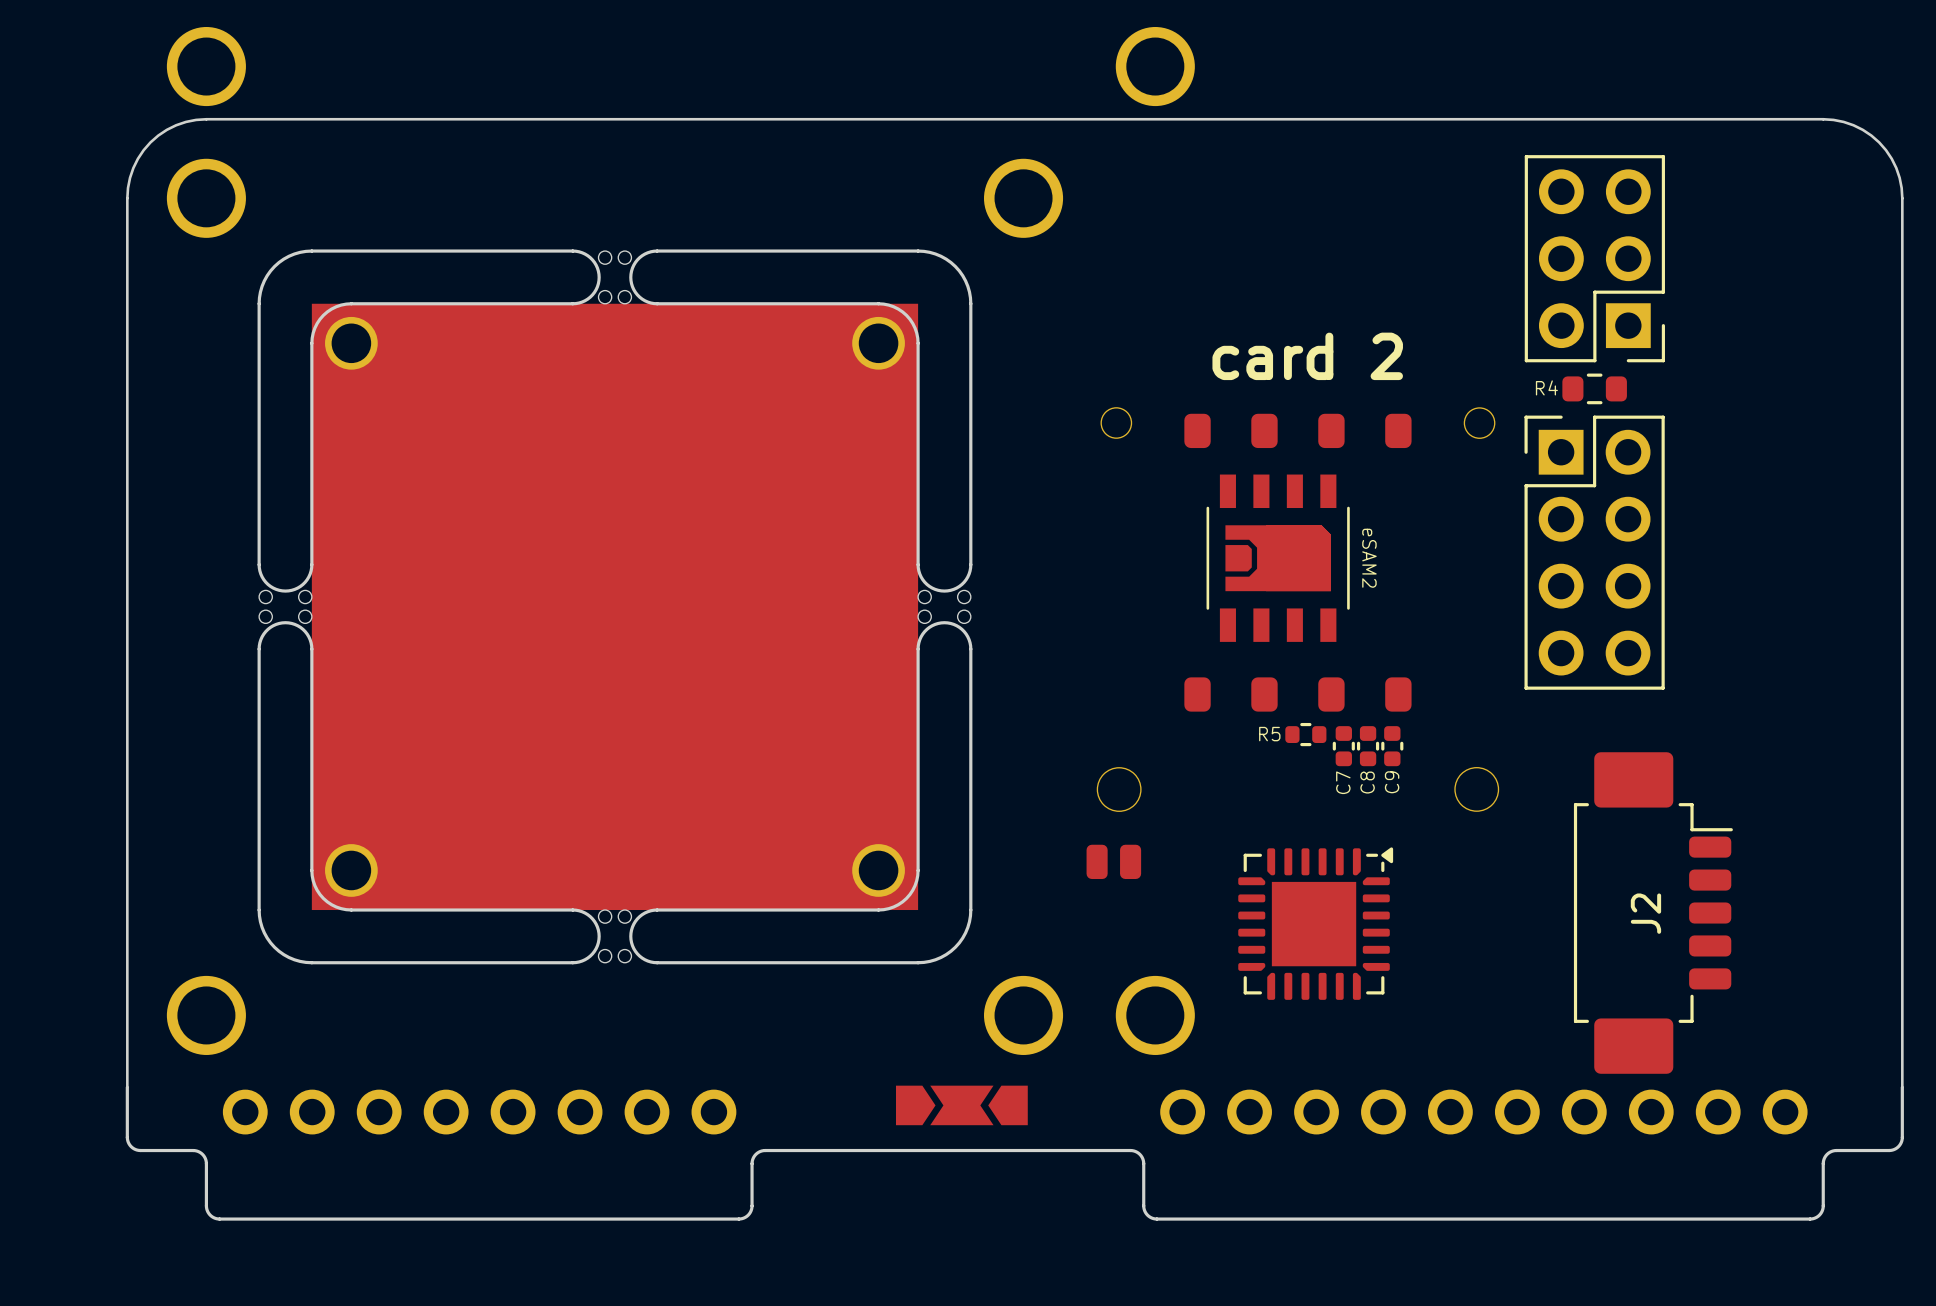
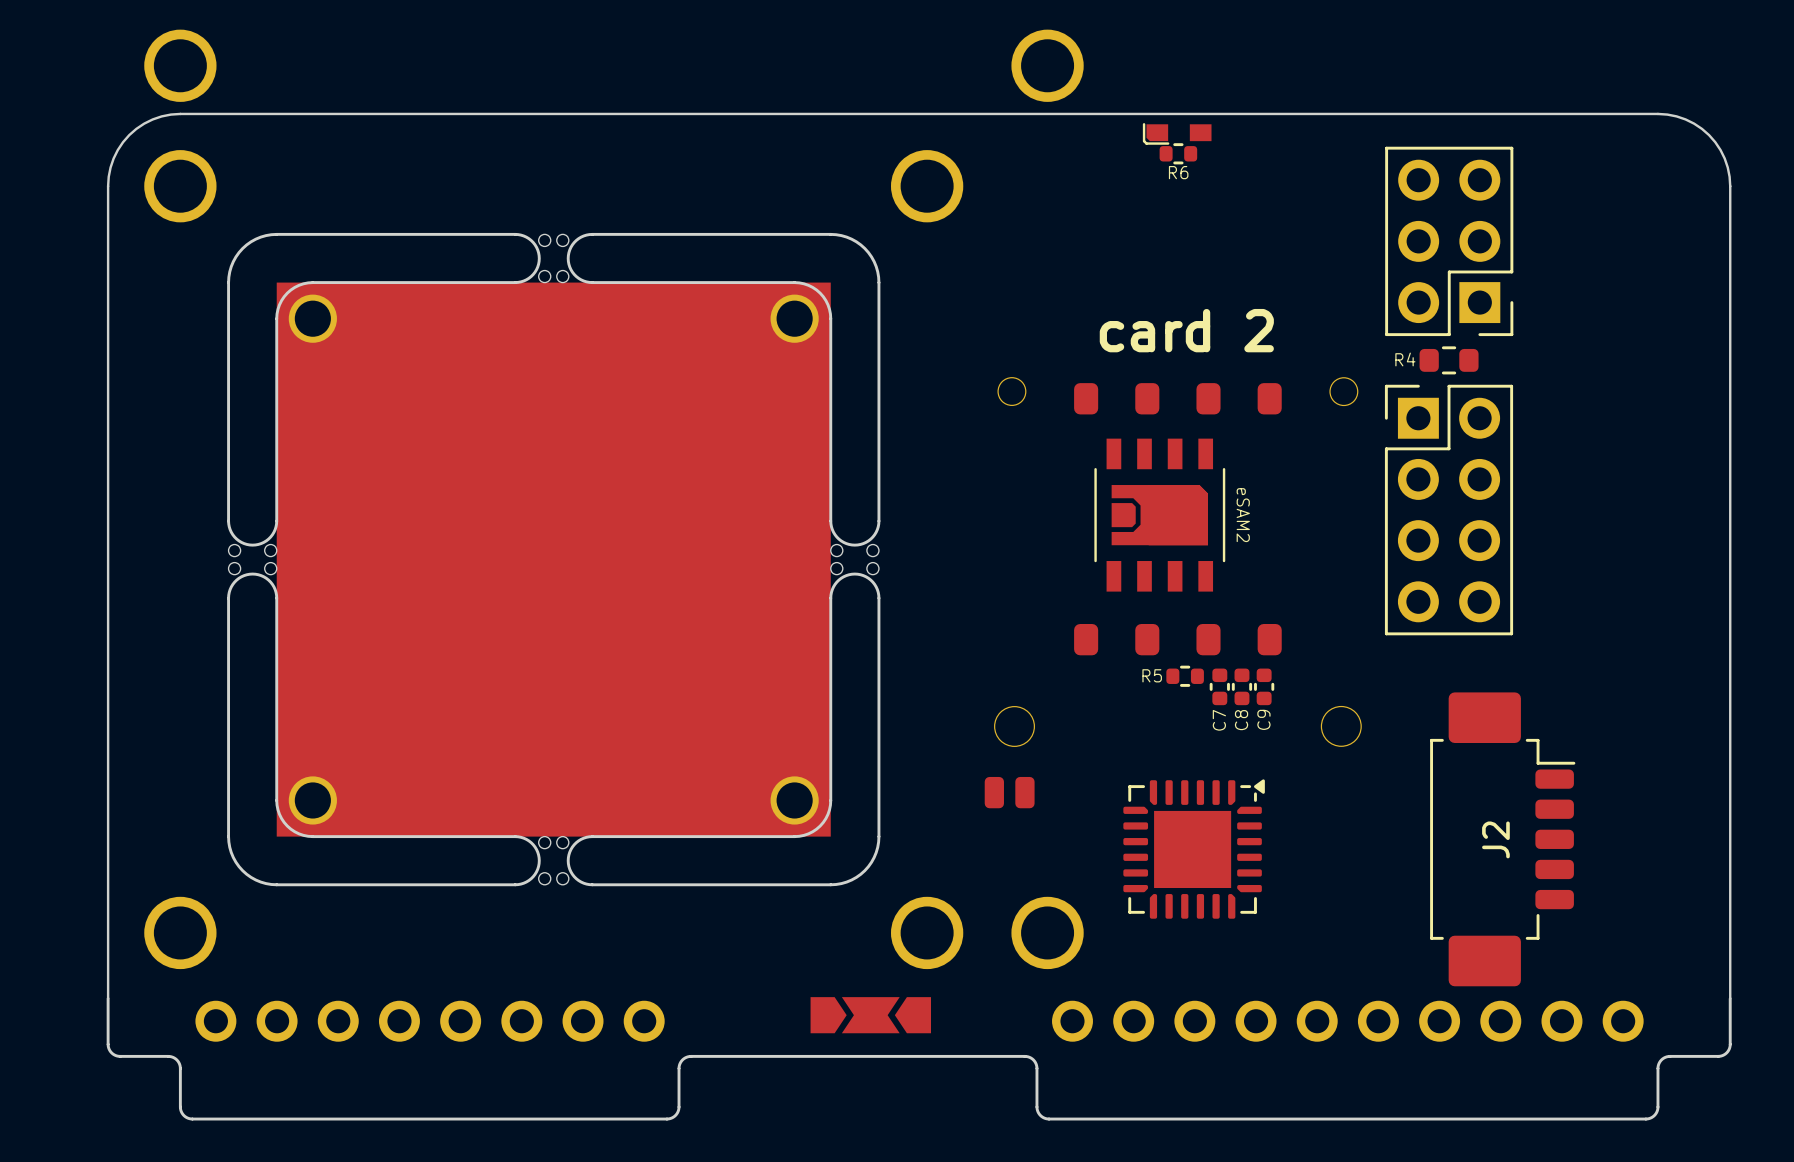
part: none -> (1177, 133)
R6: none -> (1178, 153)

